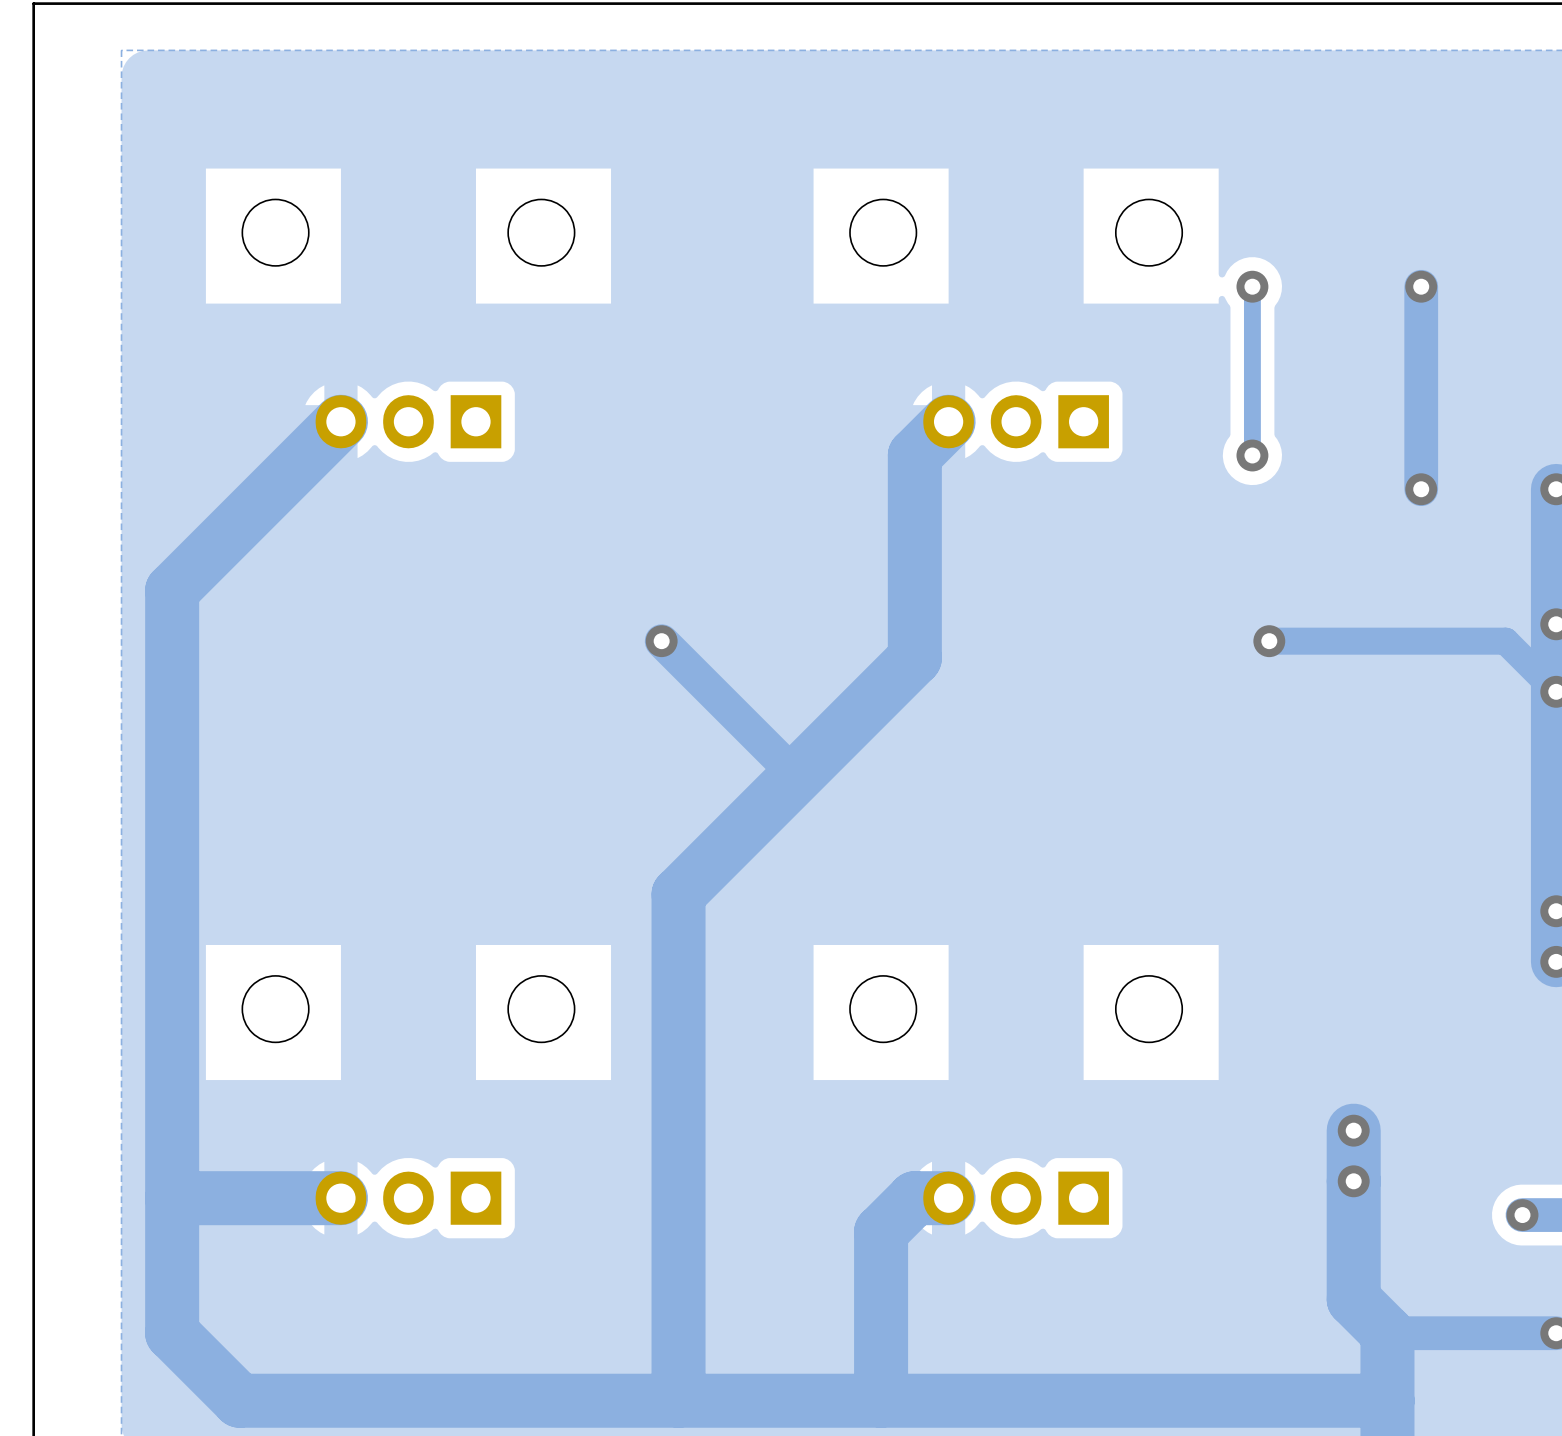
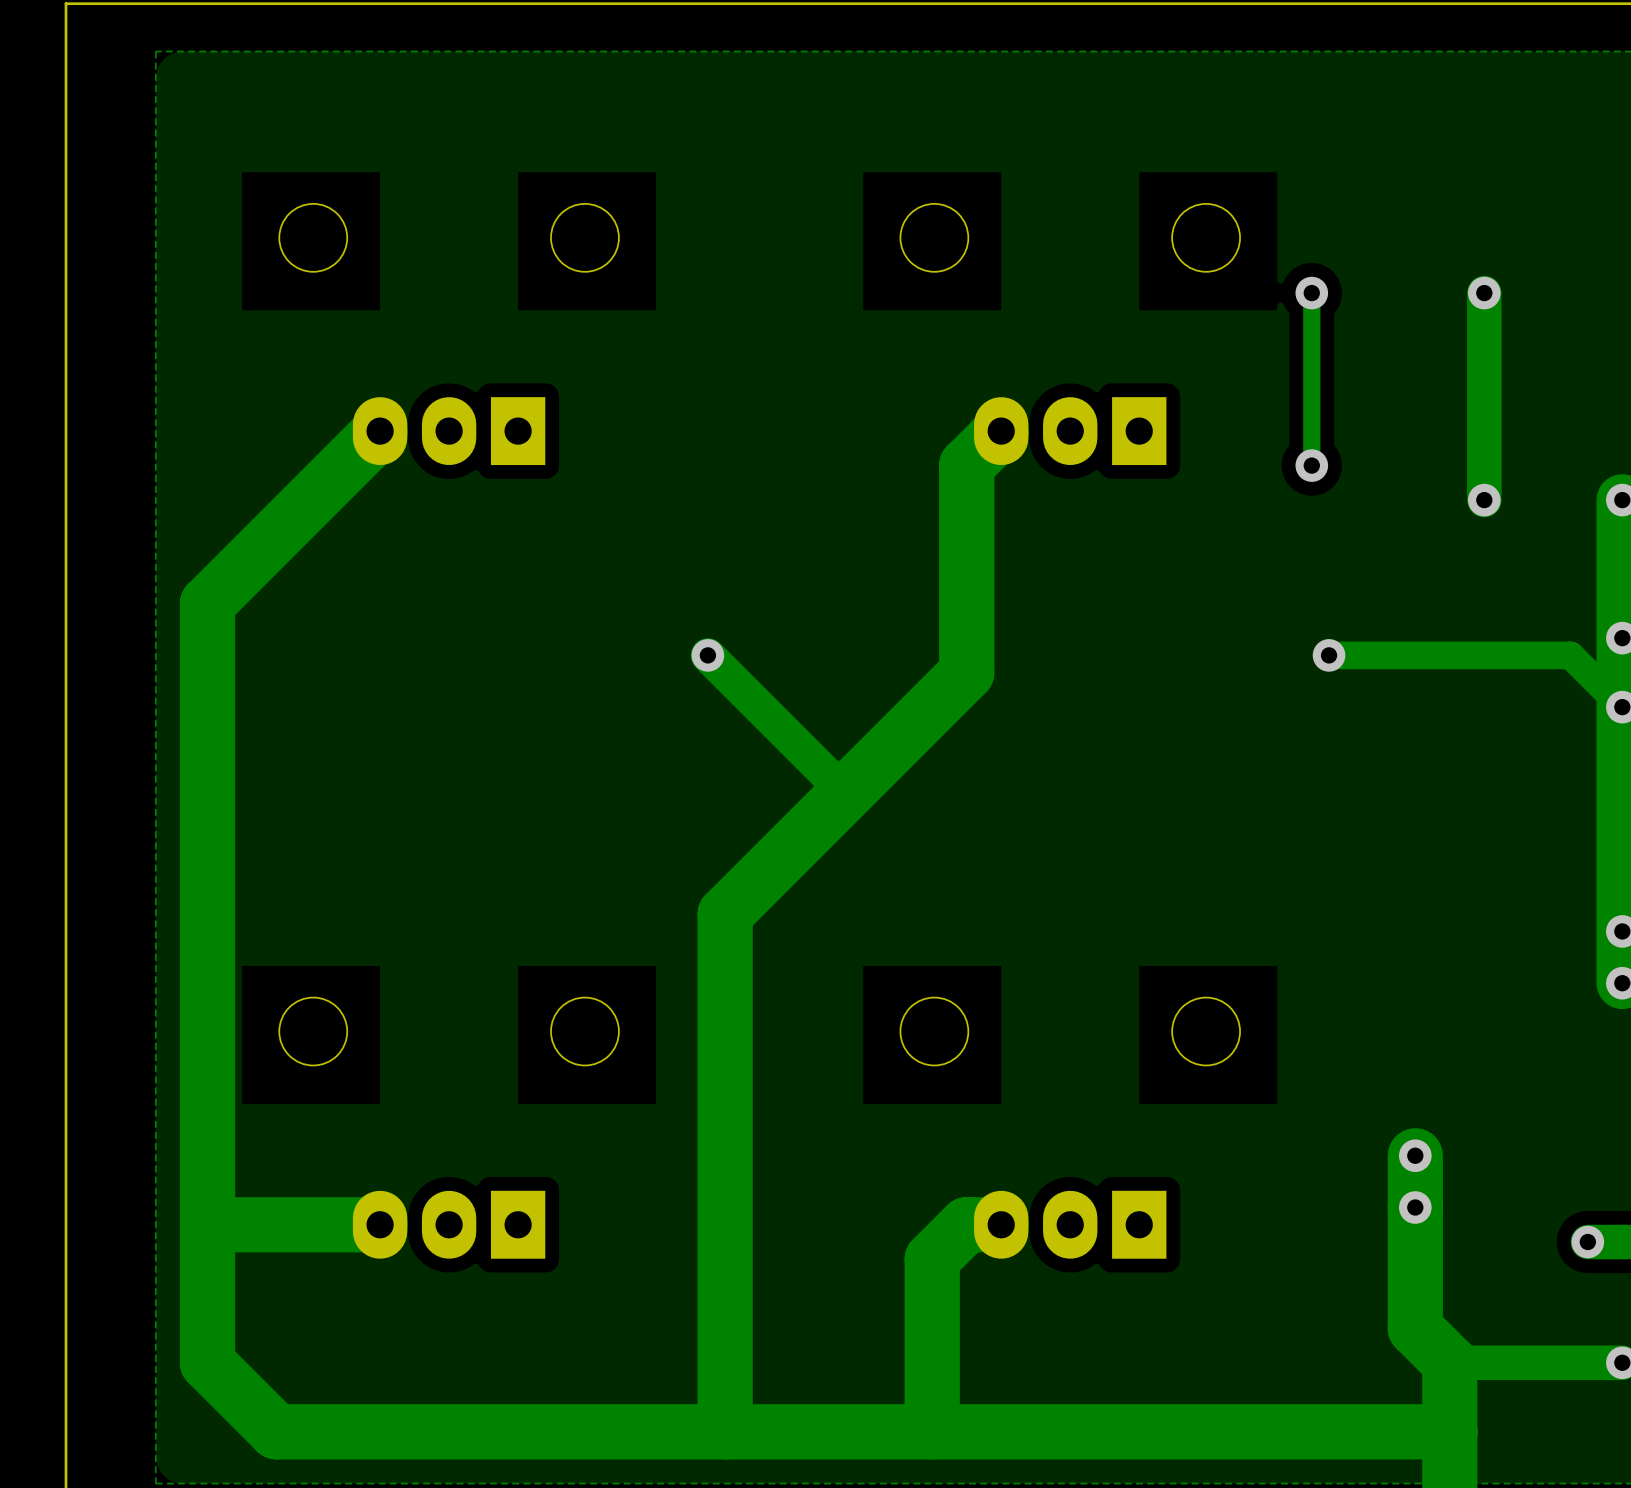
part footprint: [315, 395, 502, 449] -> [352, 397, 546, 466]
part footprint: [923, 395, 1109, 449] -> [974, 397, 1167, 466]
part footprint: [315, 1171, 502, 1225] -> [352, 1190, 546, 1259]
part footprint: [923, 1171, 1109, 1225] -> [974, 1190, 1167, 1259]

